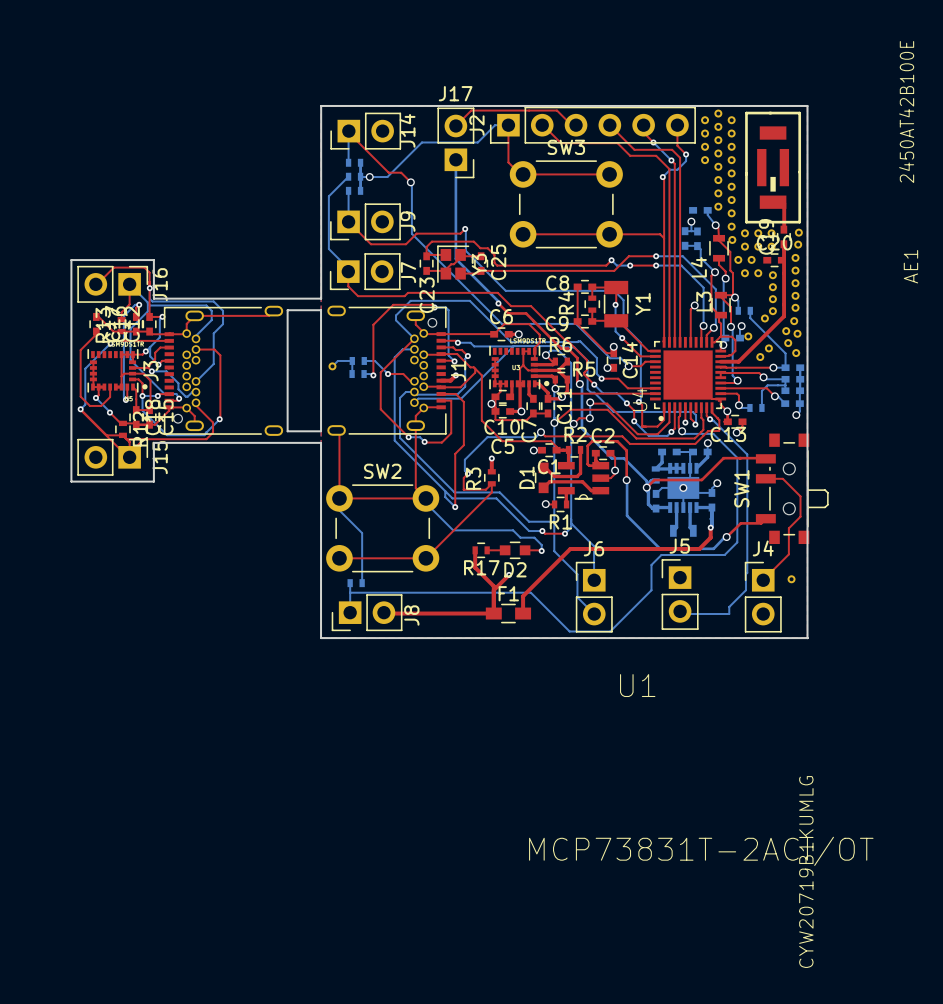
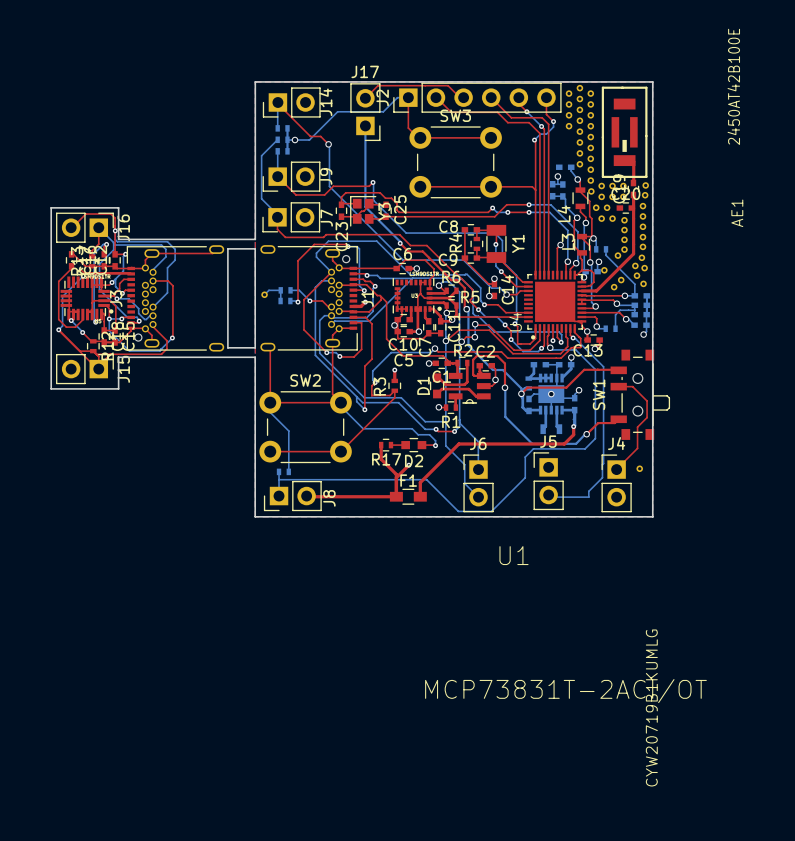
top track: none -> (81, 270) (84, 272) (130, 272)
part footprint: [87, 348, 148, 393] -> [60, 276, 114, 321]

